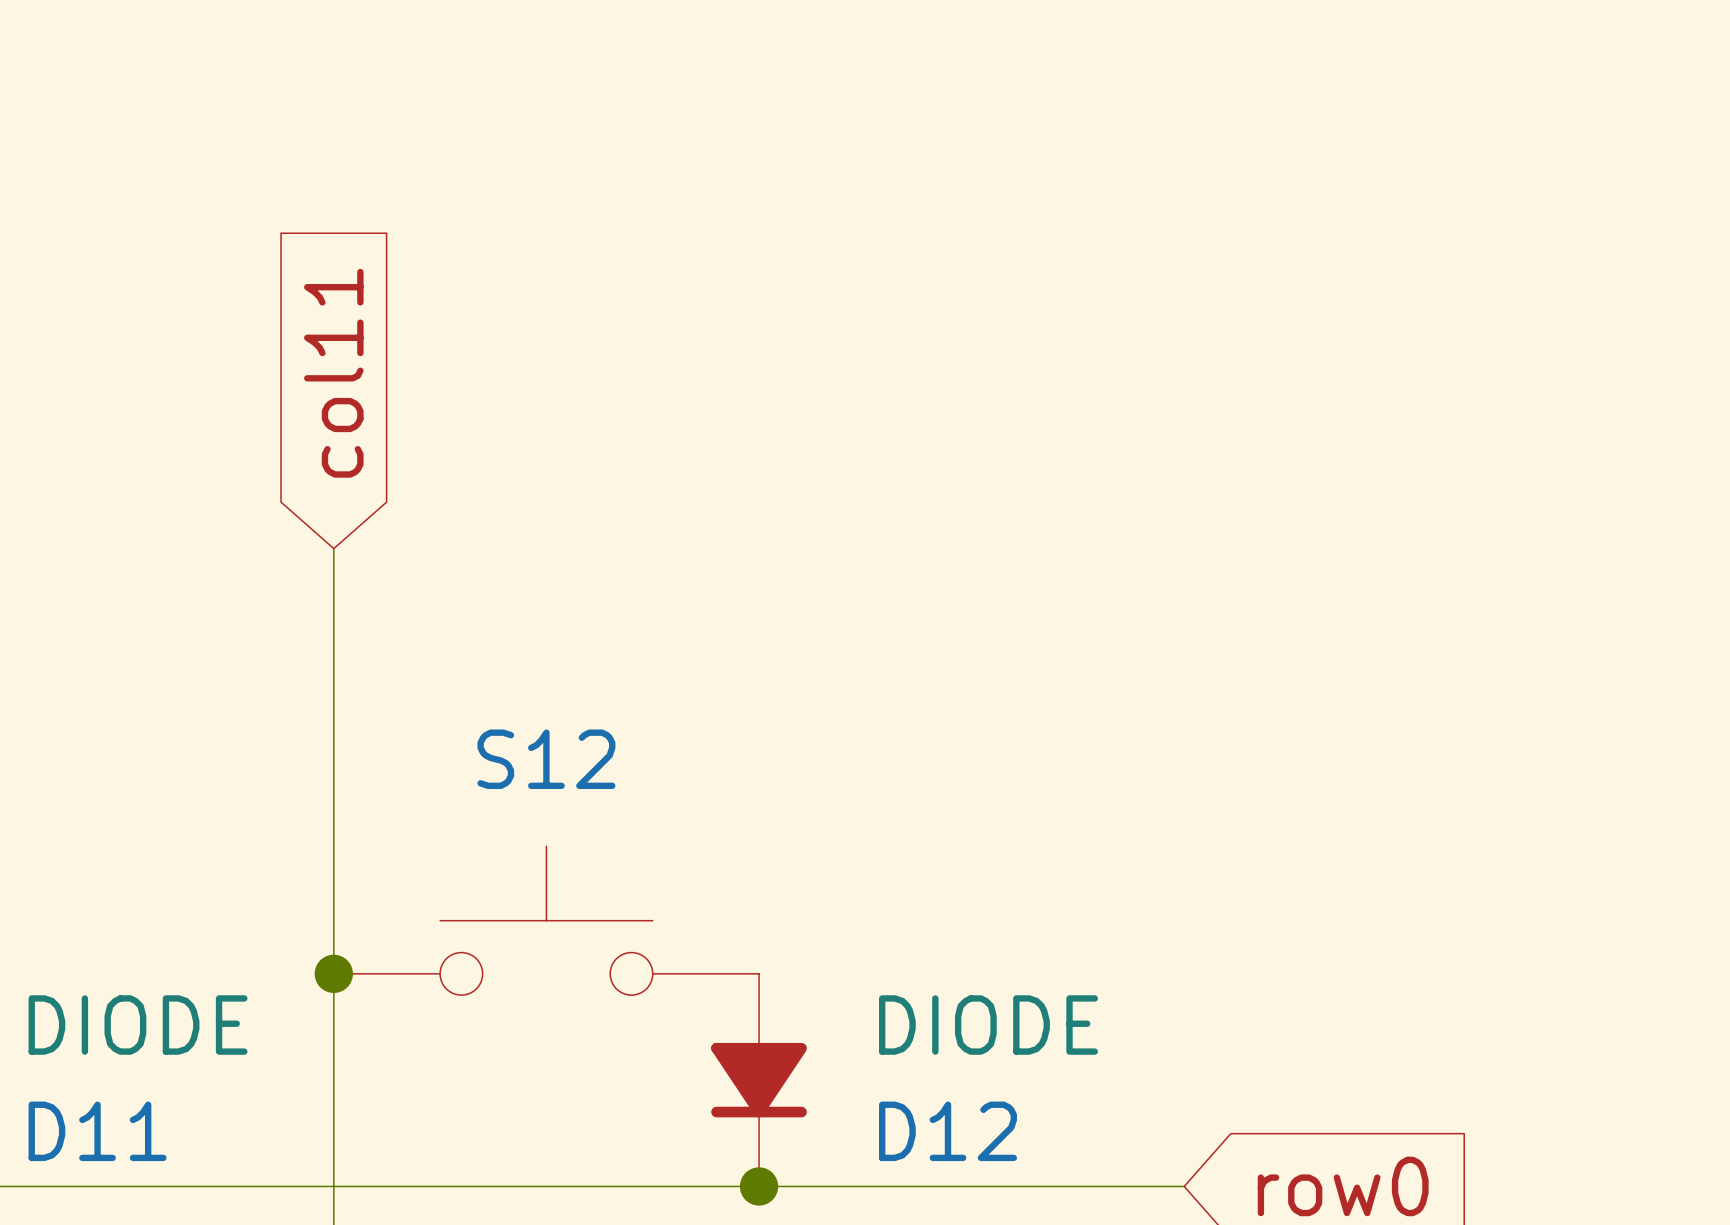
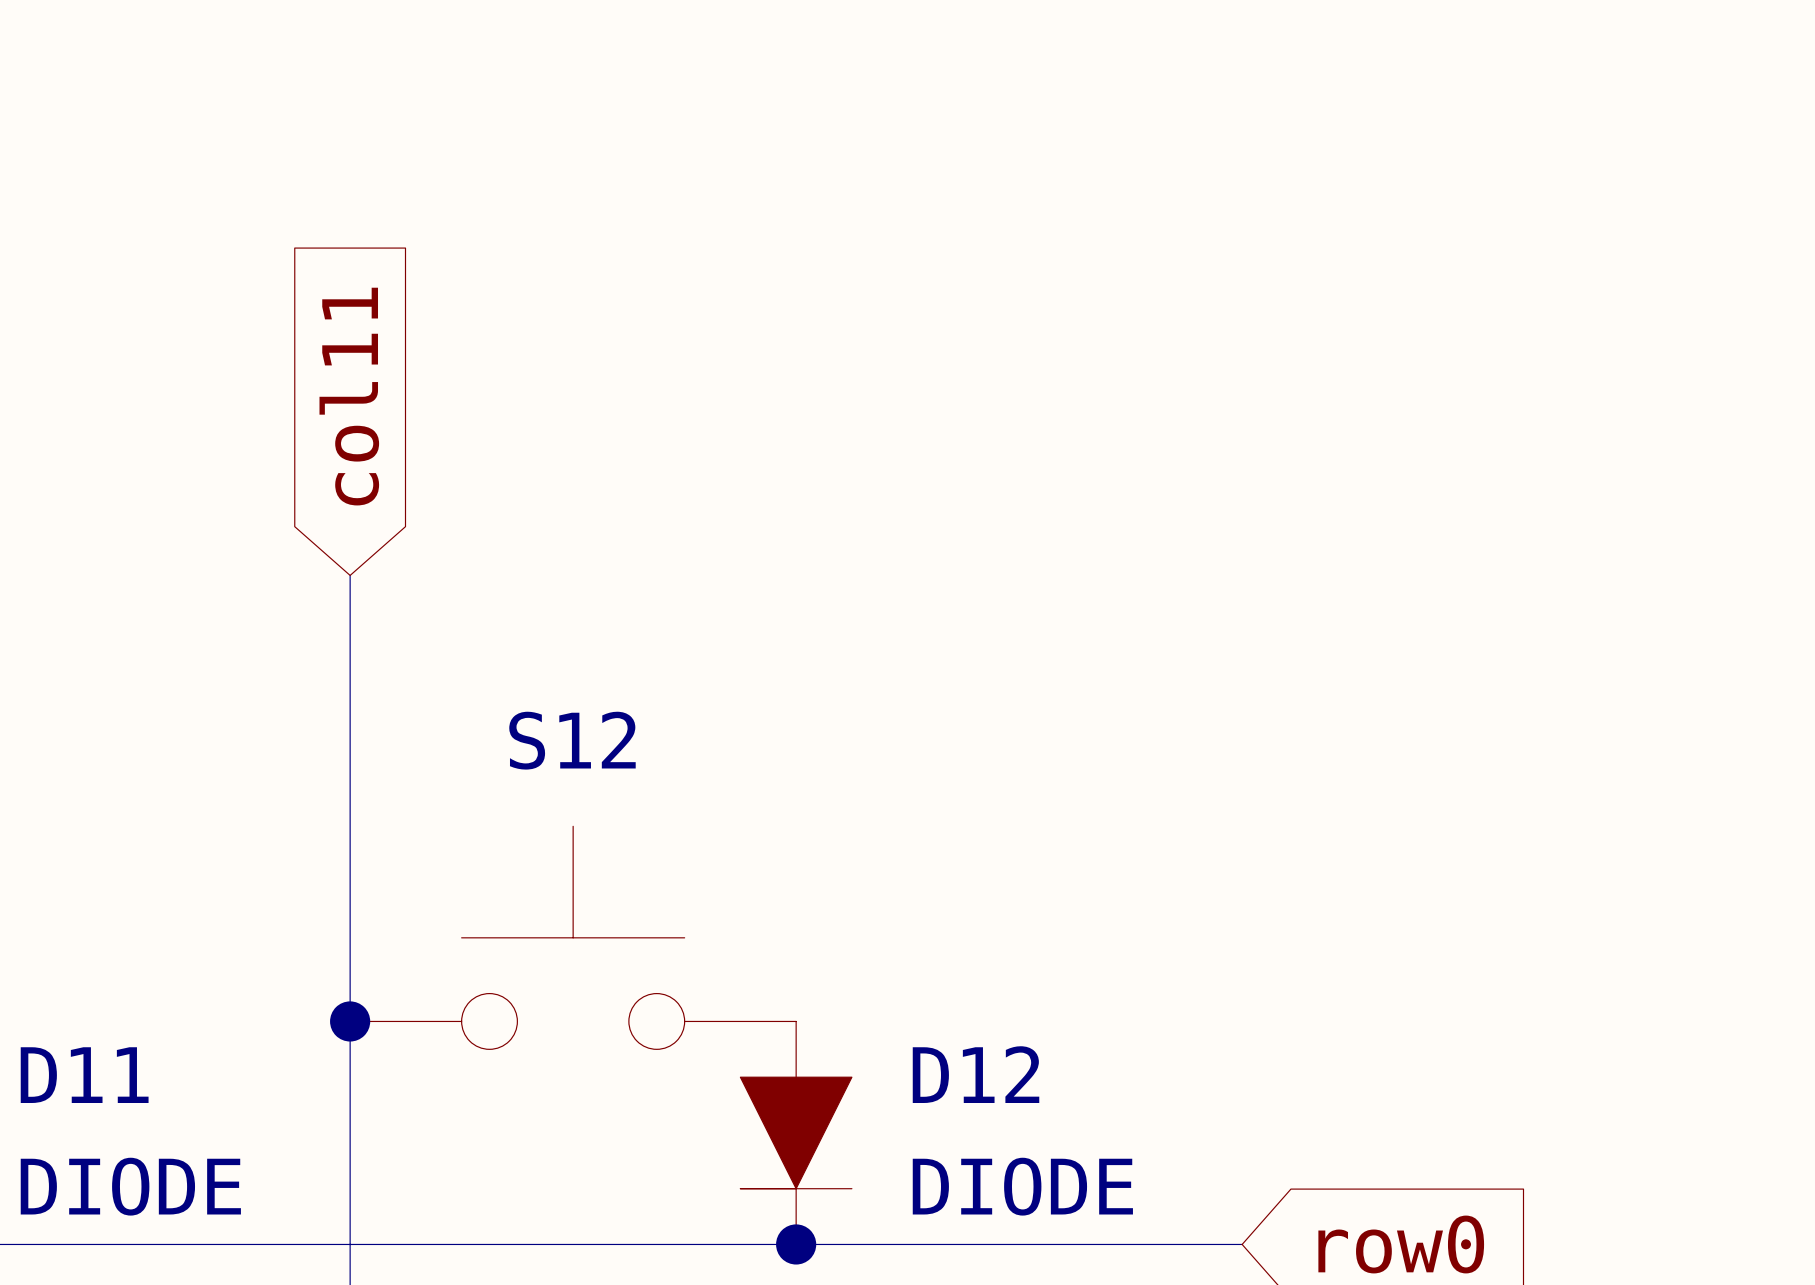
S12 symbol: [333, 846, 760, 996] -> [350, 826, 797, 1050]
D12 symbol: [711, 973, 807, 1187] -> [740, 1021, 852, 1245]
D11 value position: DIODE (138, 1025) -> DIODE (130, 1186)
D12 value position: DIODE (988, 1025) -> DIODE (1022, 1186)
D11 name position: D11 (97, 1131) -> D11 (84, 1075)
D12 name position: D12 (948, 1131) -> D12 (976, 1074)

